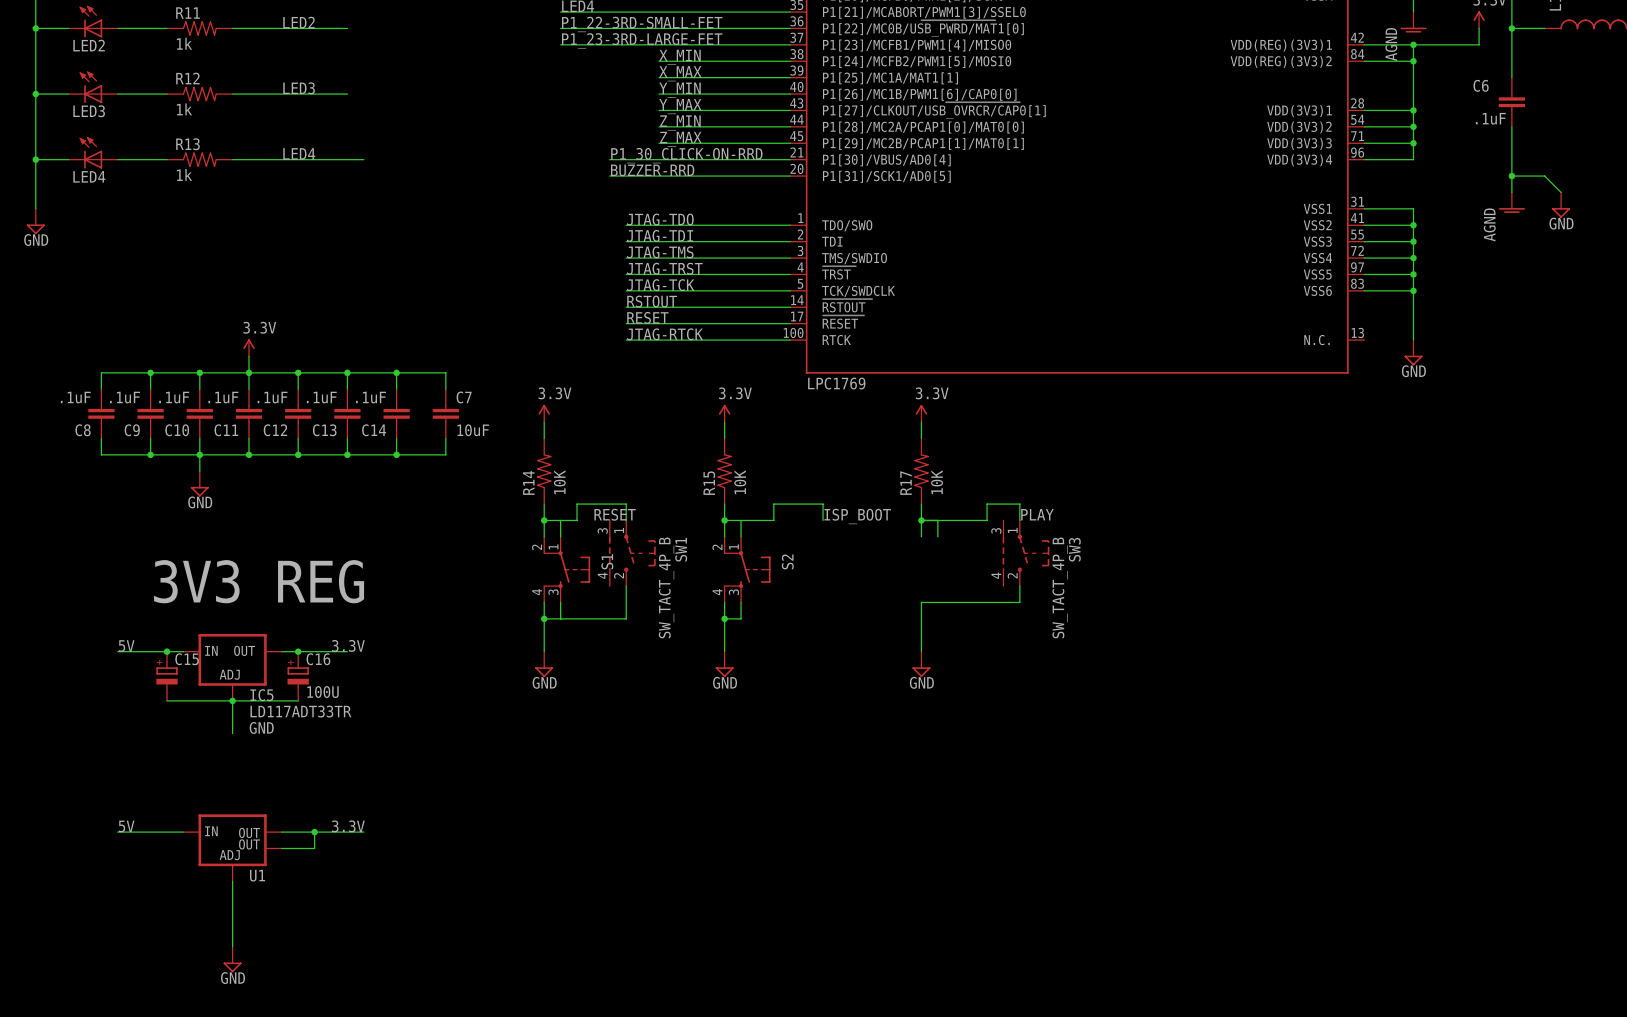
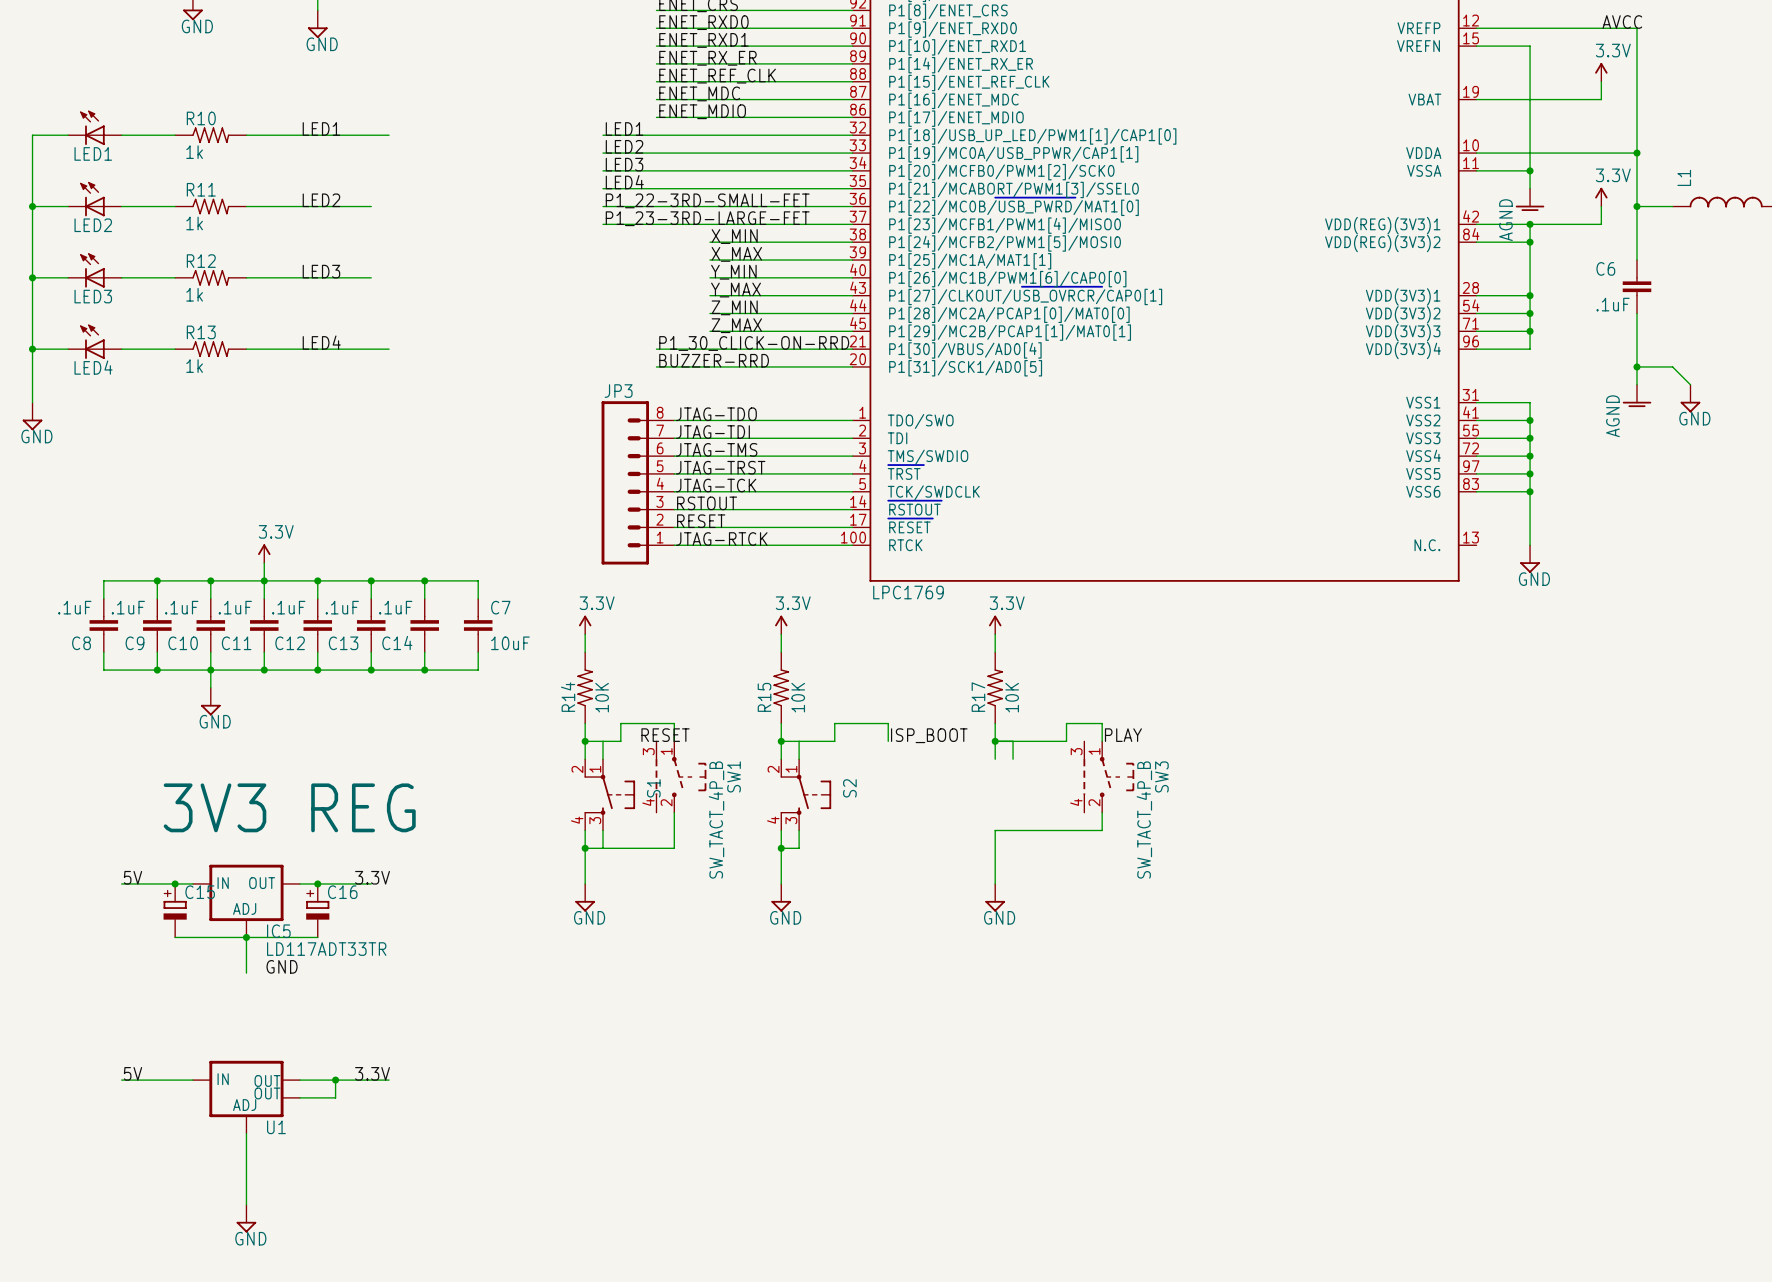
JP3: none -> (637, 482)
C16 value: 100U (323, 692) -> none

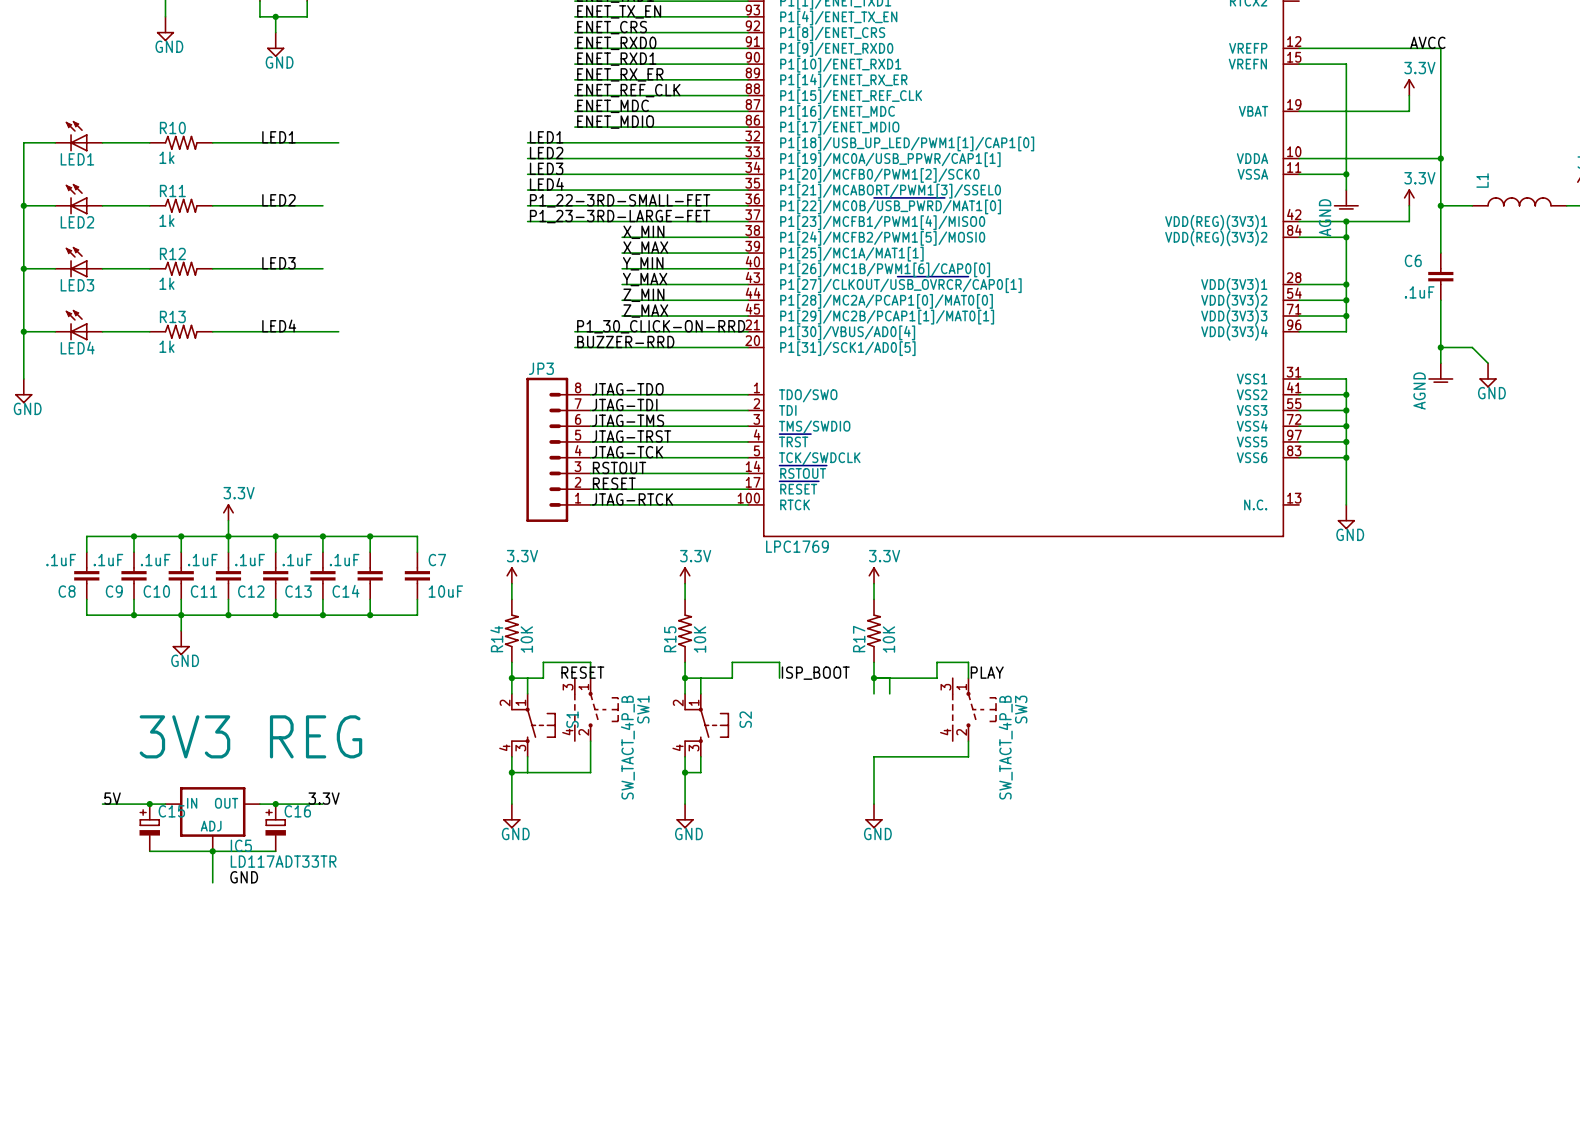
label: 5V (133, 1073) -> none
label: 3.3V (372, 1073) -> none
wire: (121, 1080) (192, 1080) -> none
wire: (299, 1080) (389, 1080) -> none
wire: (335, 1080) (335, 1097) (299, 1097) -> none
junction: (335, 1080) -> none
U1: (246, 1097) -> none
wire: (246, 1133) (246, 1204) -> none
power symbol: GND (246, 1218) -> none

